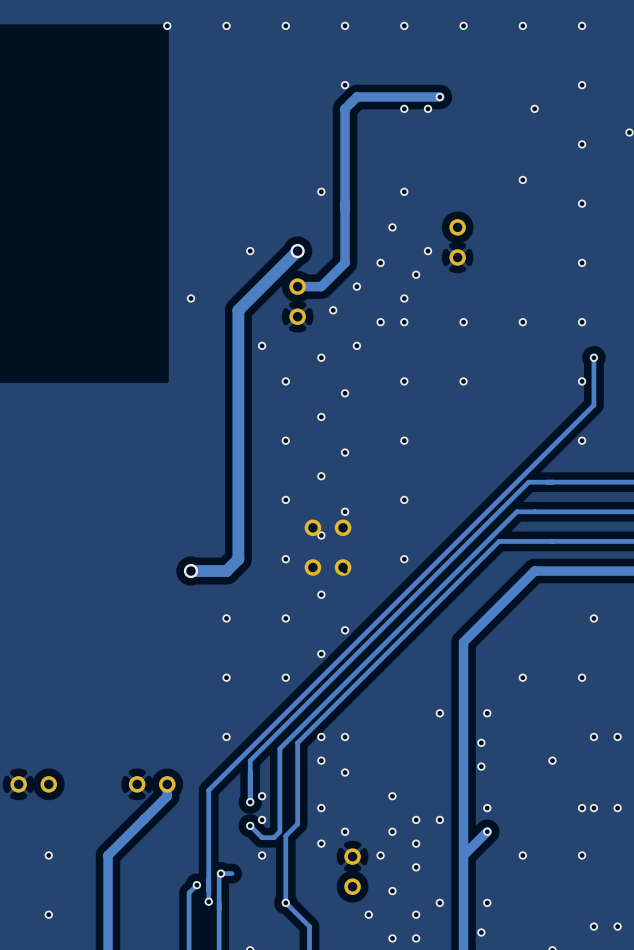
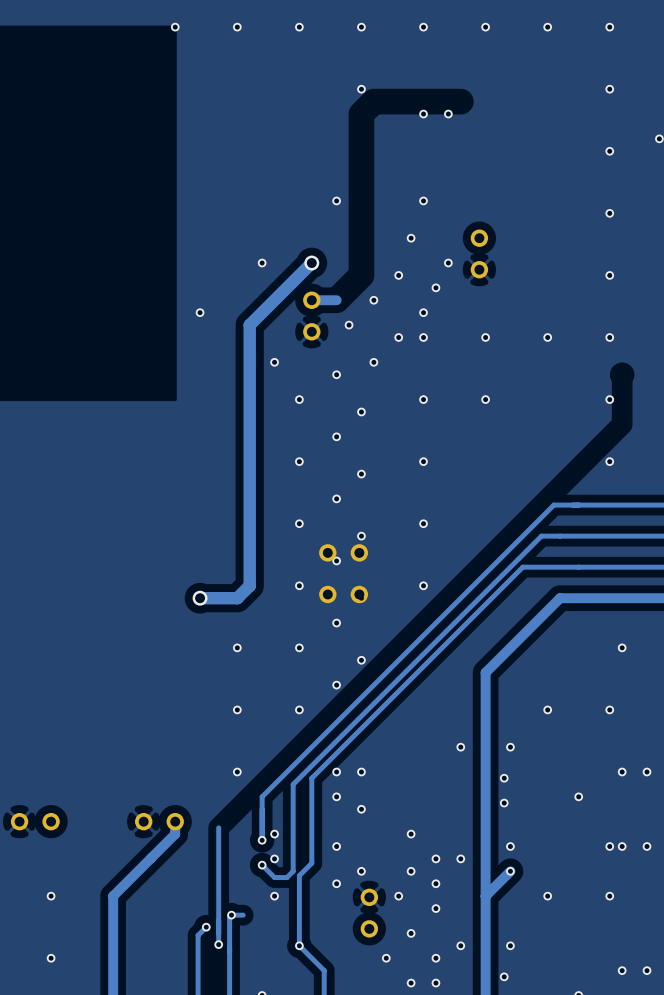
track: (439, 97) (356, 97) (345, 108) (345, 262) (321, 286) -> none
via: (439, 97) -> none
via: (534, 108) -> none
via: (522, 179) -> none
track: (593, 357) (593, 405) (208, 790) -> none
via: (593, 357) -> none

